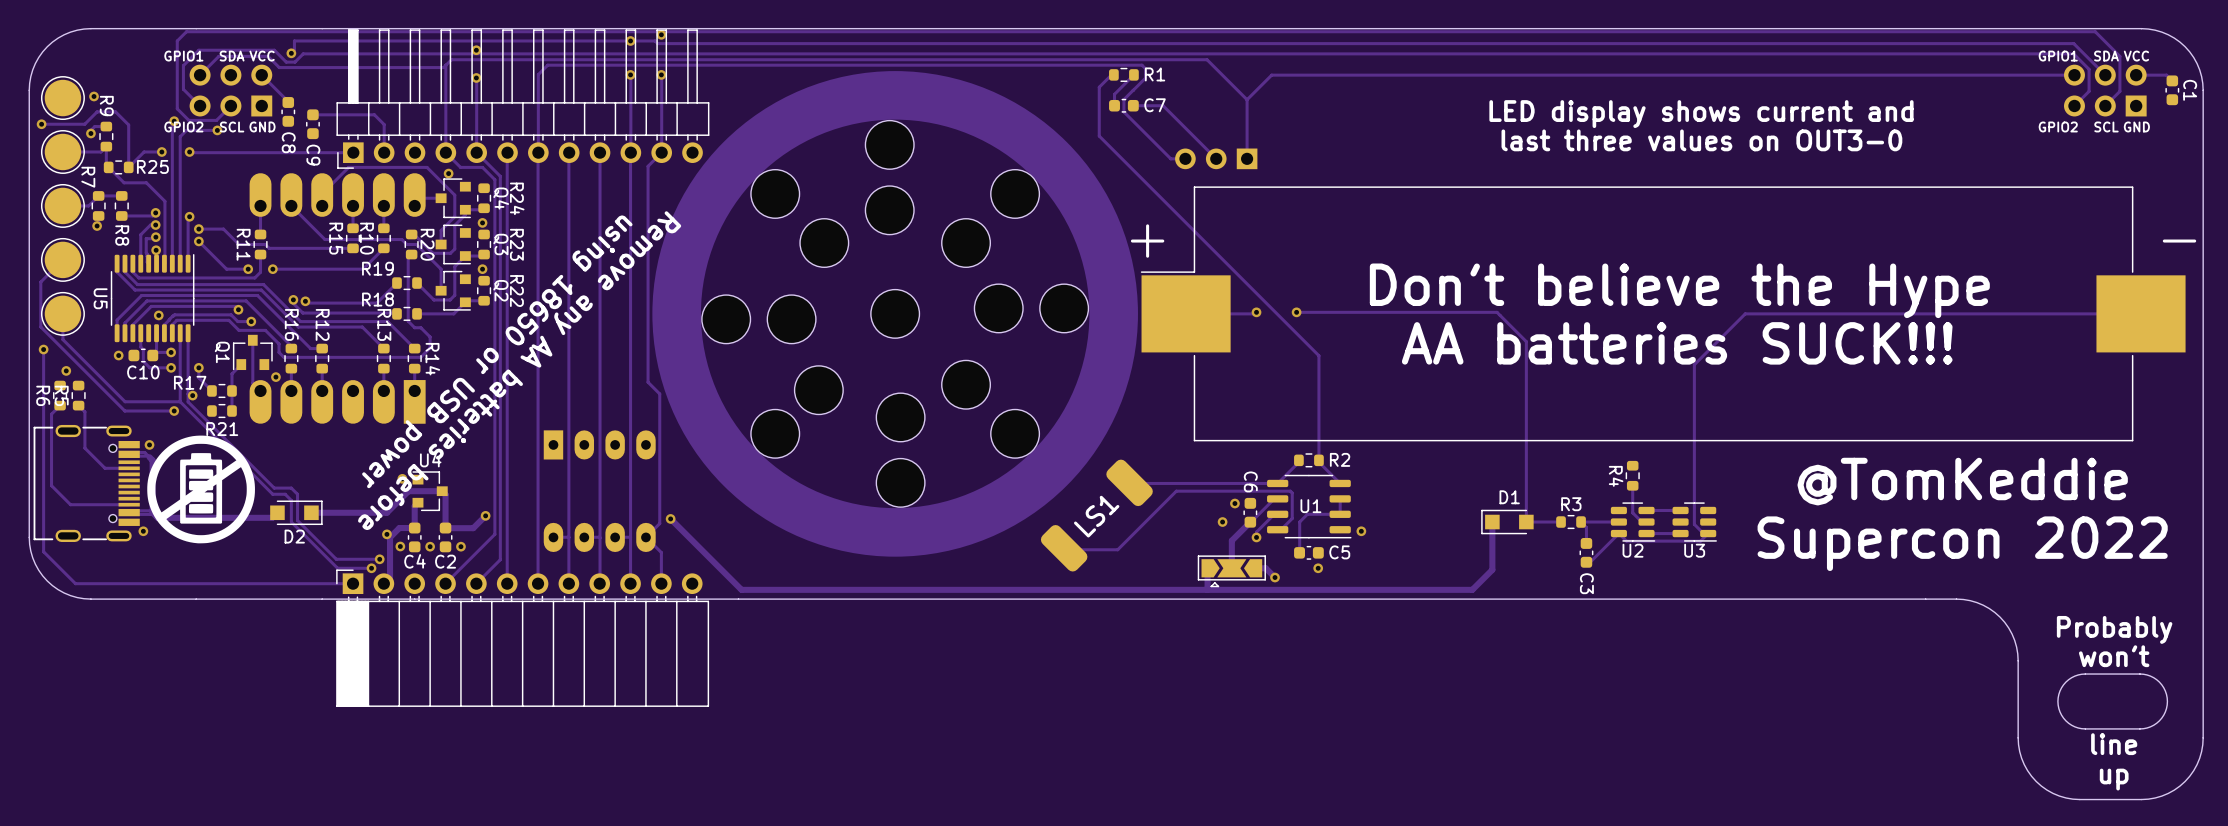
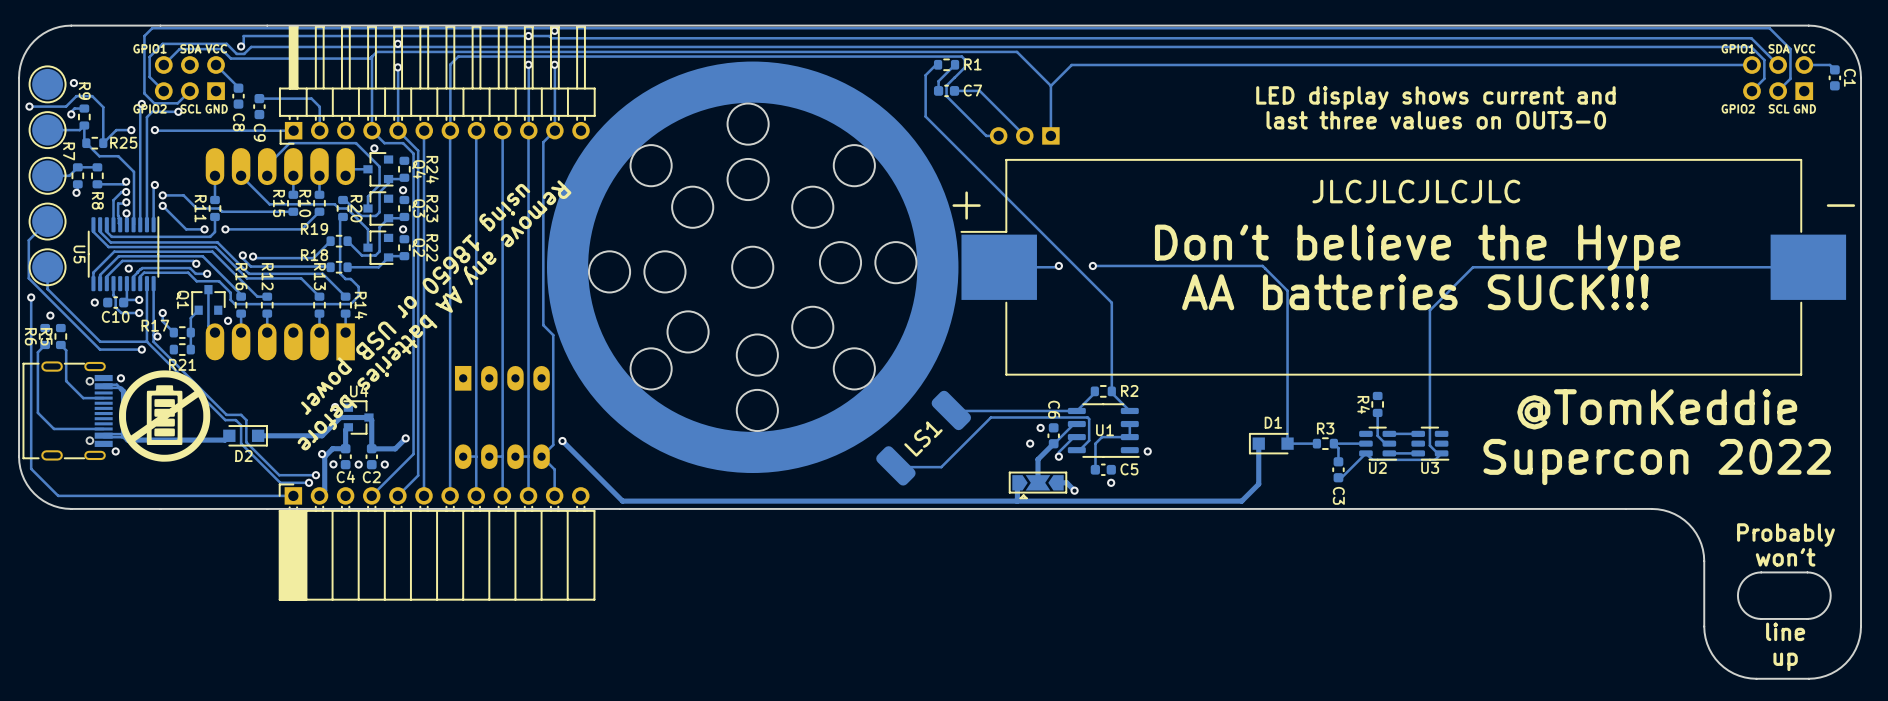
text: none -> JLCJLCJLCJLC (1416, 191)

